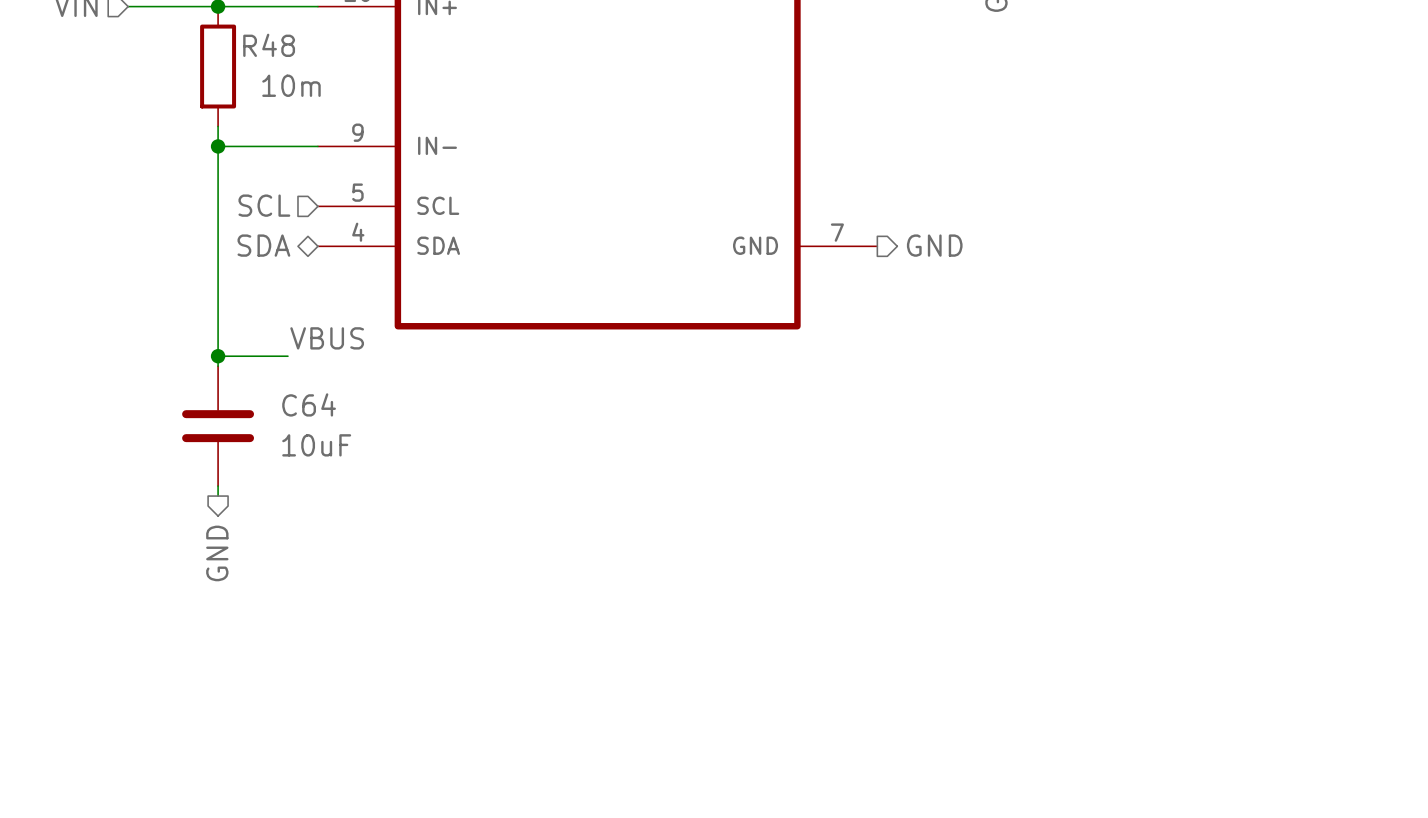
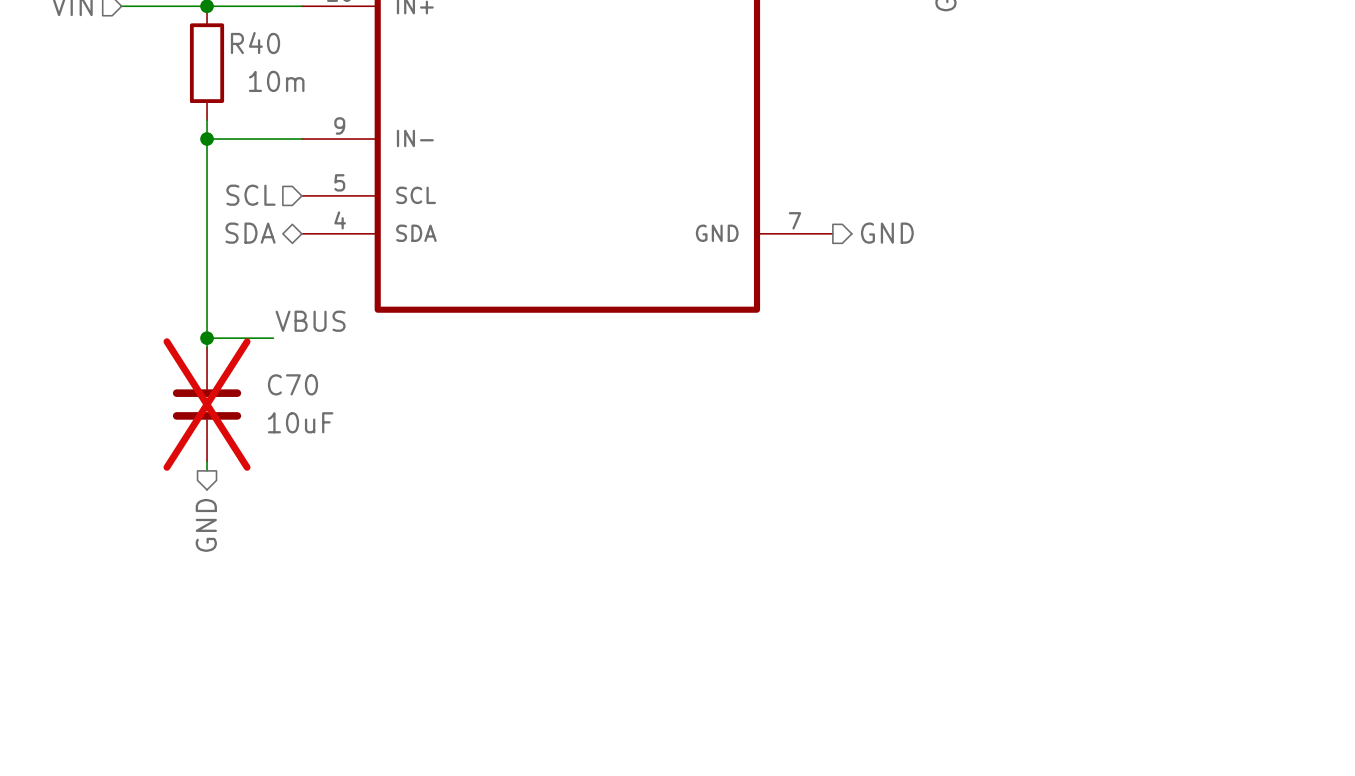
R48 name: R48 (269, 45) -> R40 (255, 43)
C64 name: C64 (309, 404) -> C70 (292, 384)
C64 do-not-place cross: none -> (207, 404)

